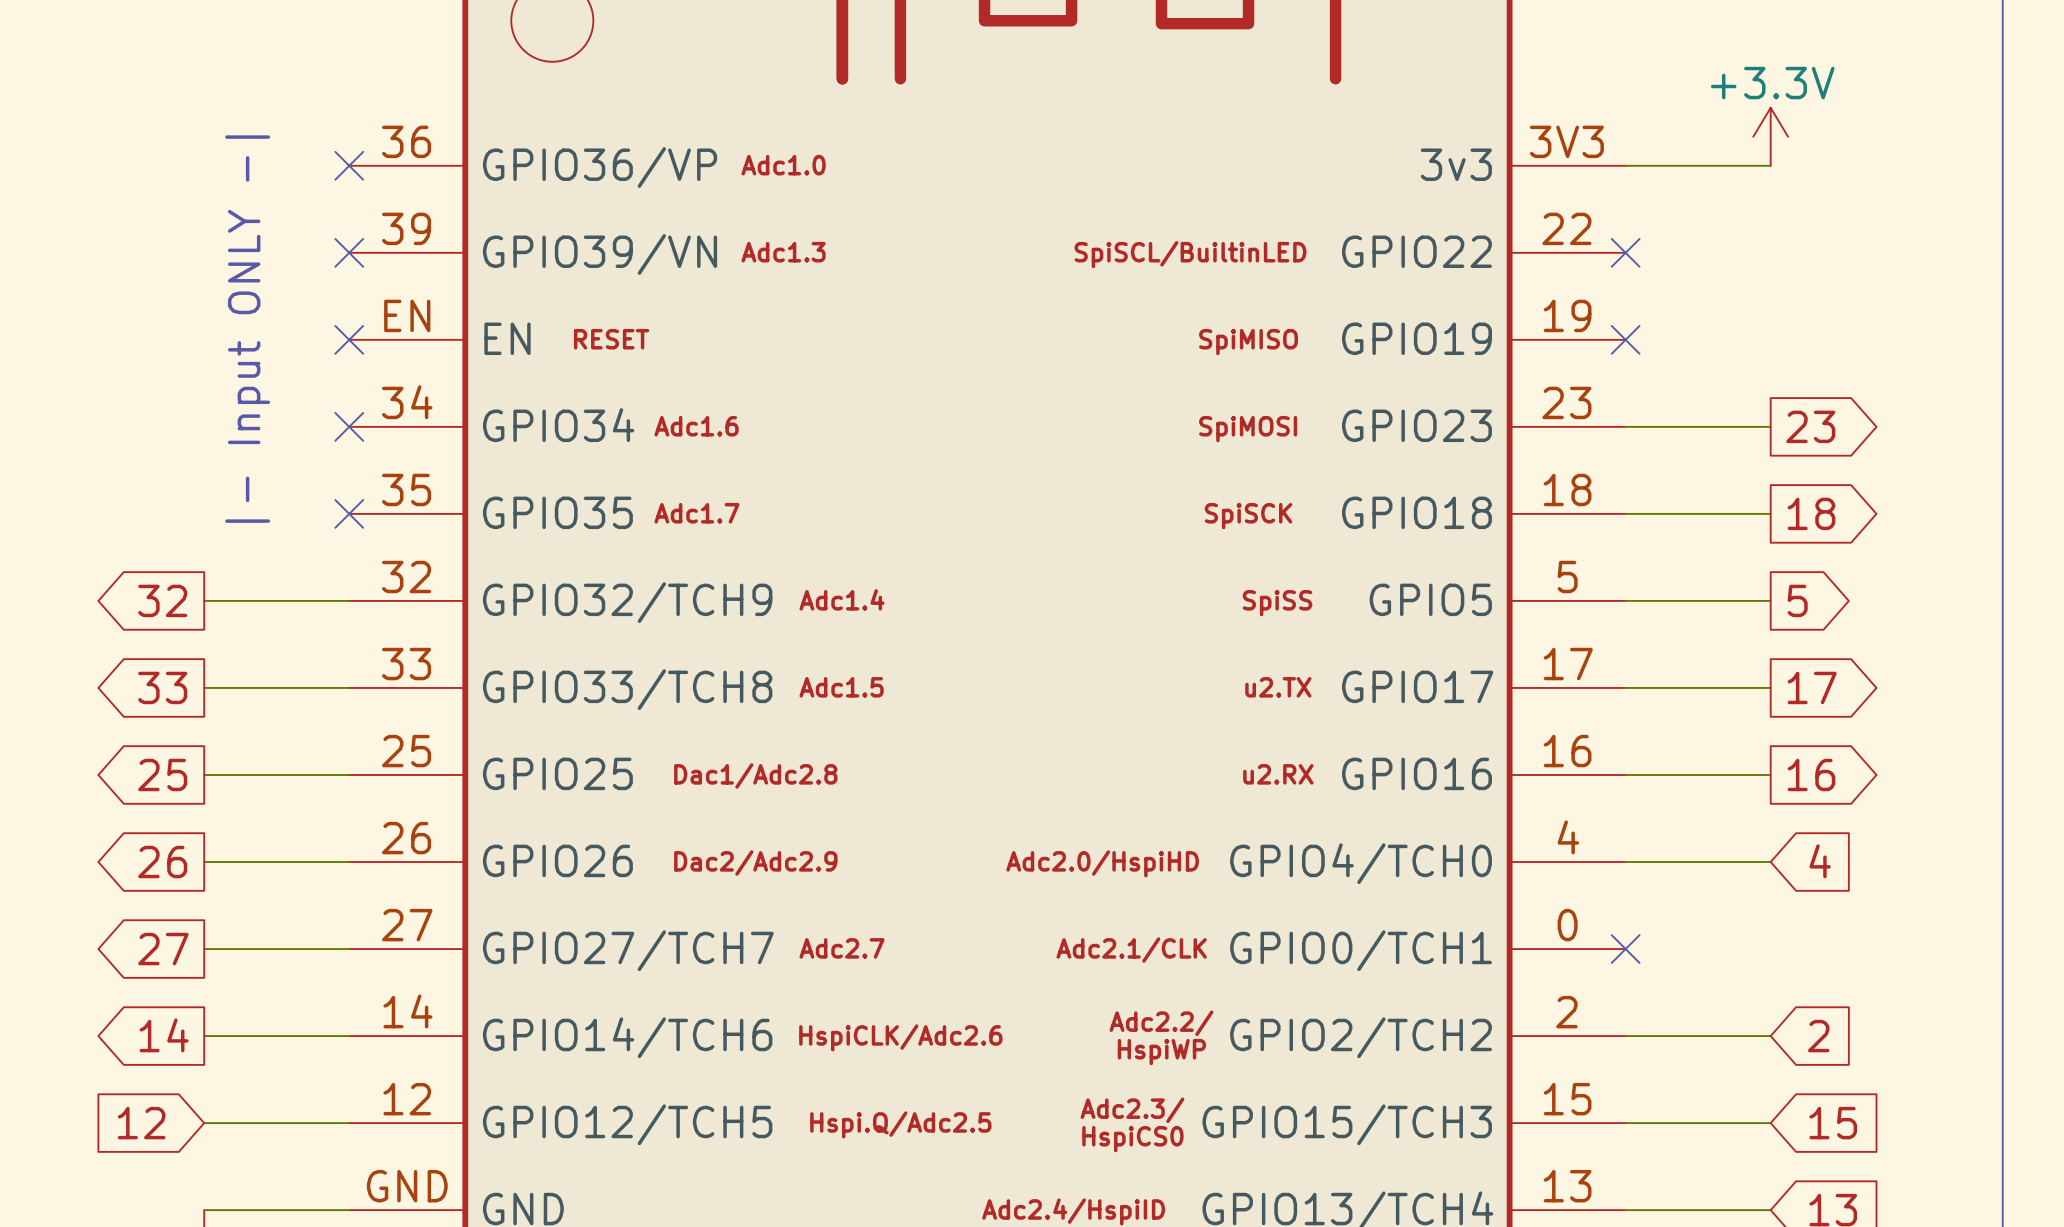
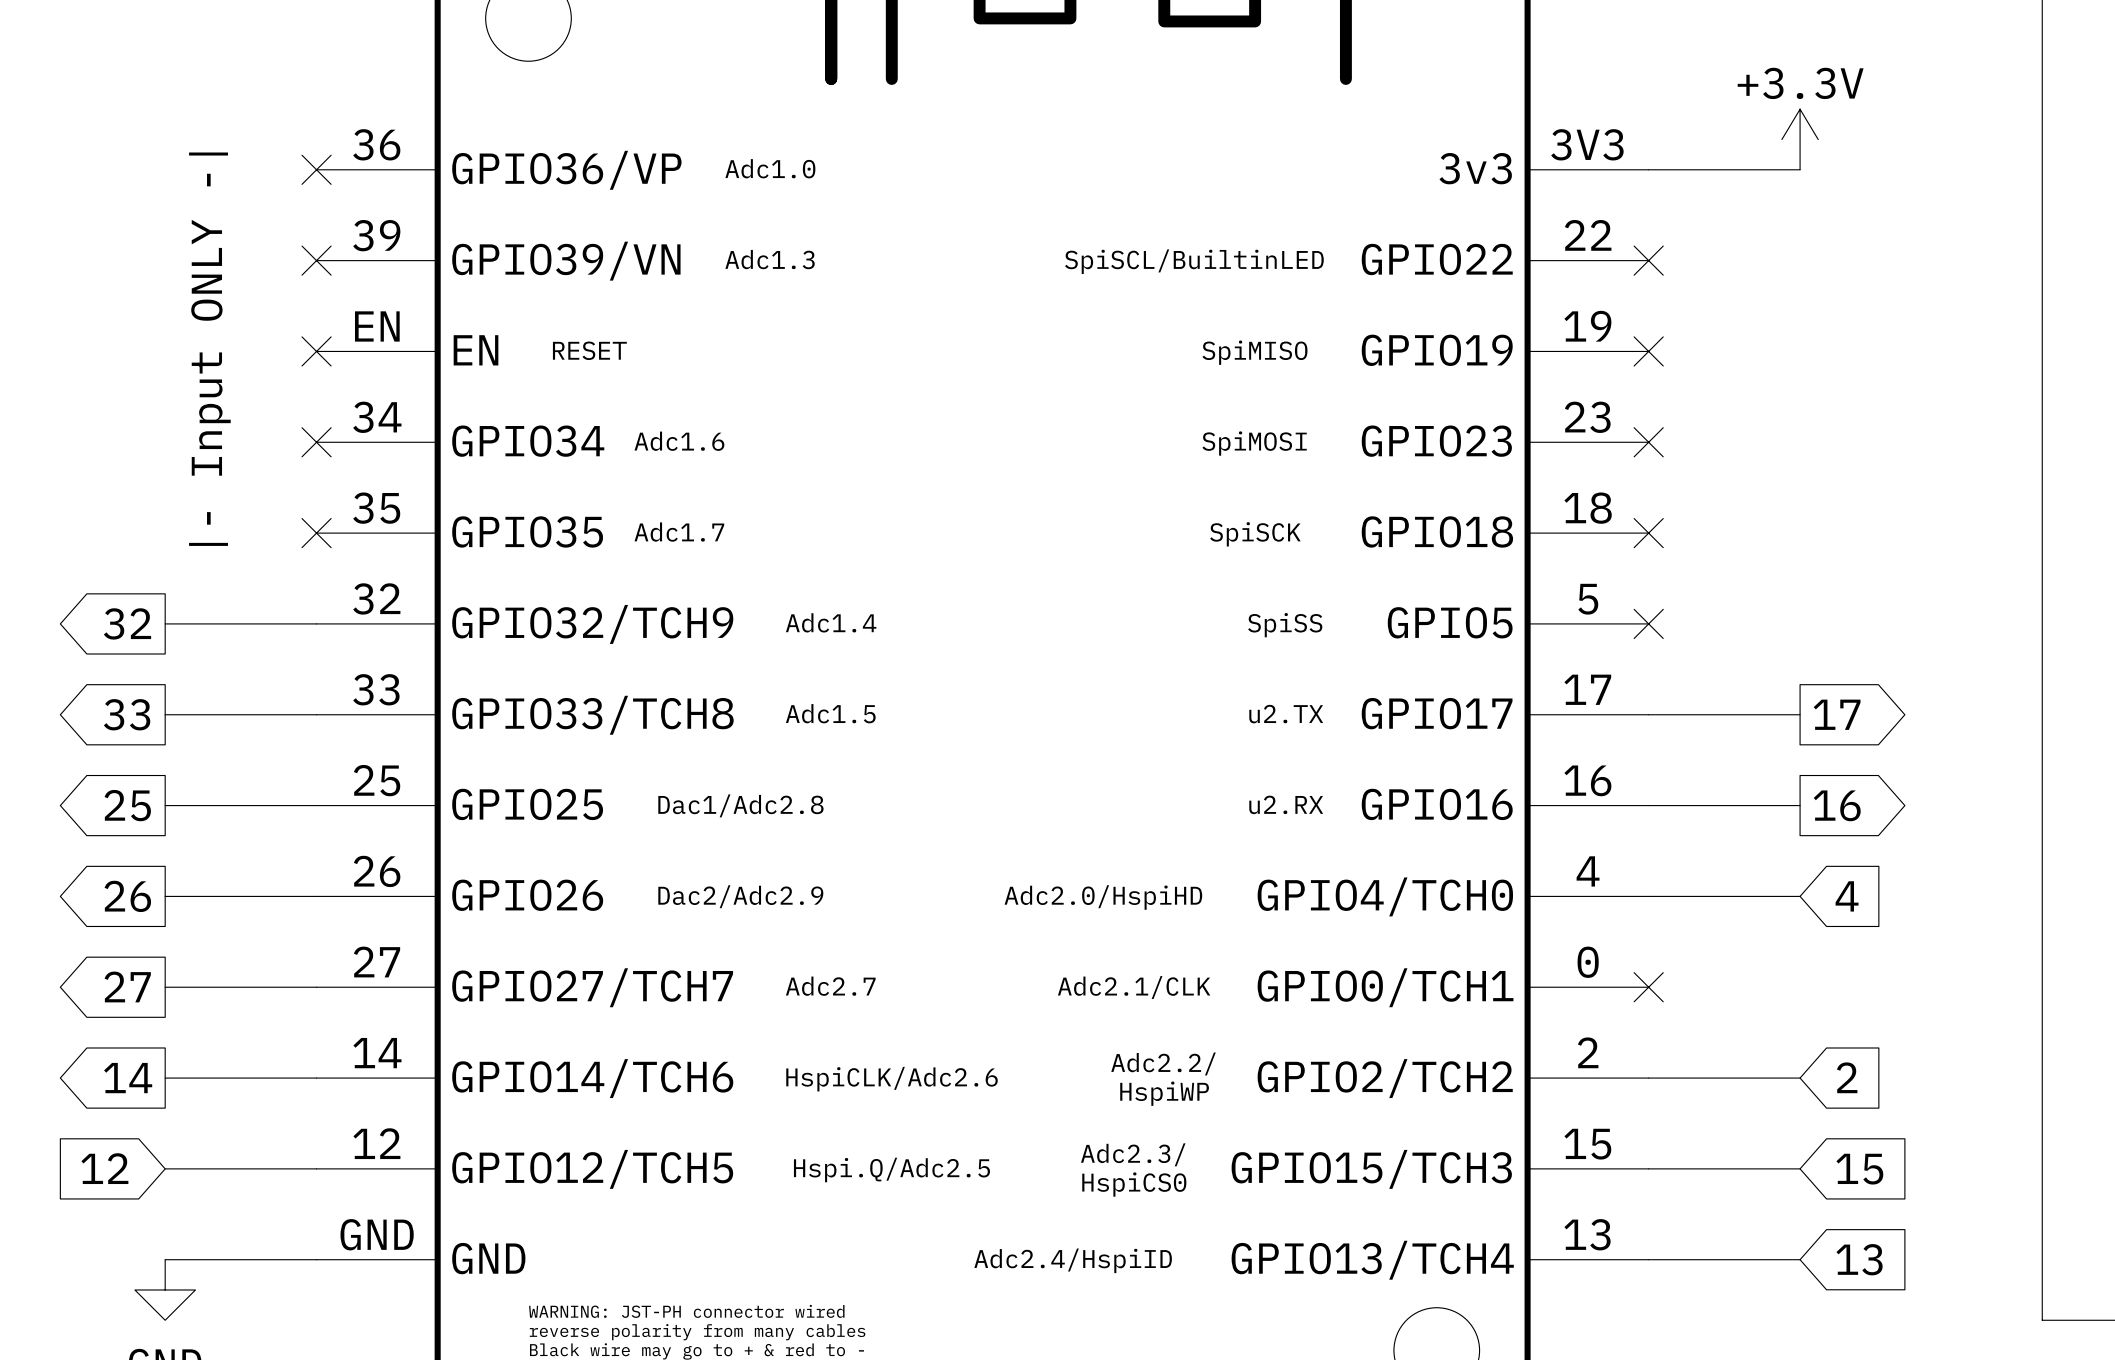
wire: (1625, 426) (1770, 426) -> none
no-connect mark: none -> (1648, 442)
global label: 23 (1810, 426) -> none
wire: (1625, 513) (1770, 513) -> none
no-connect mark: none -> (1648, 533)
global label: 18 (1811, 513) -> none
wire: (1625, 600) (1770, 600) -> none
no-connect mark: none -> (1648, 623)
global label: 5 (1797, 600) -> none

